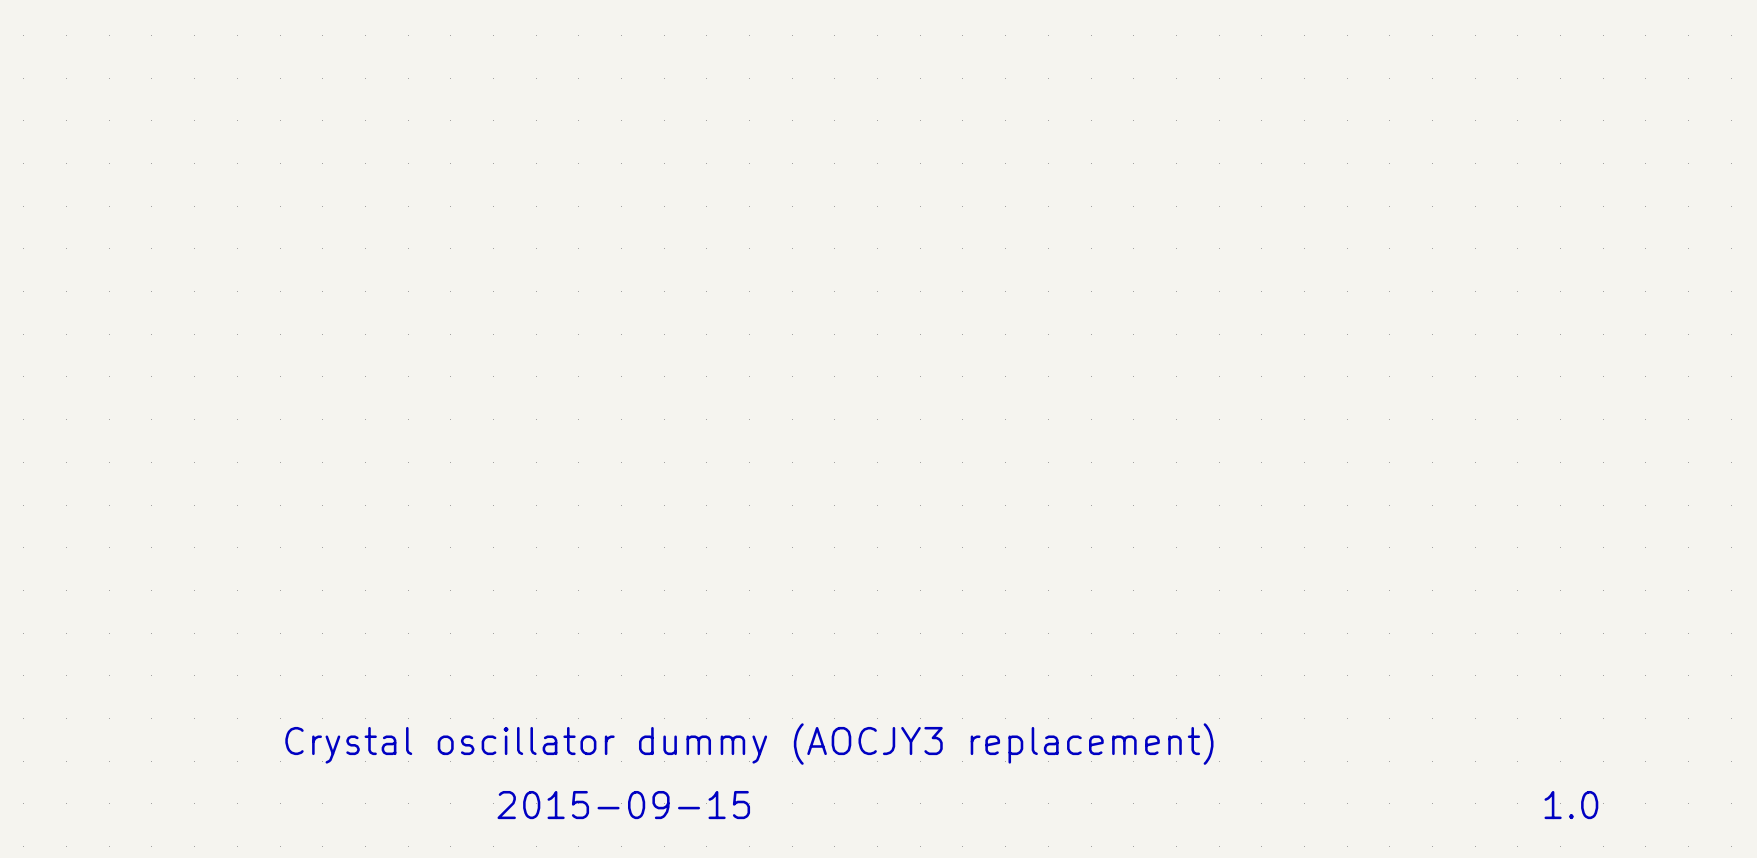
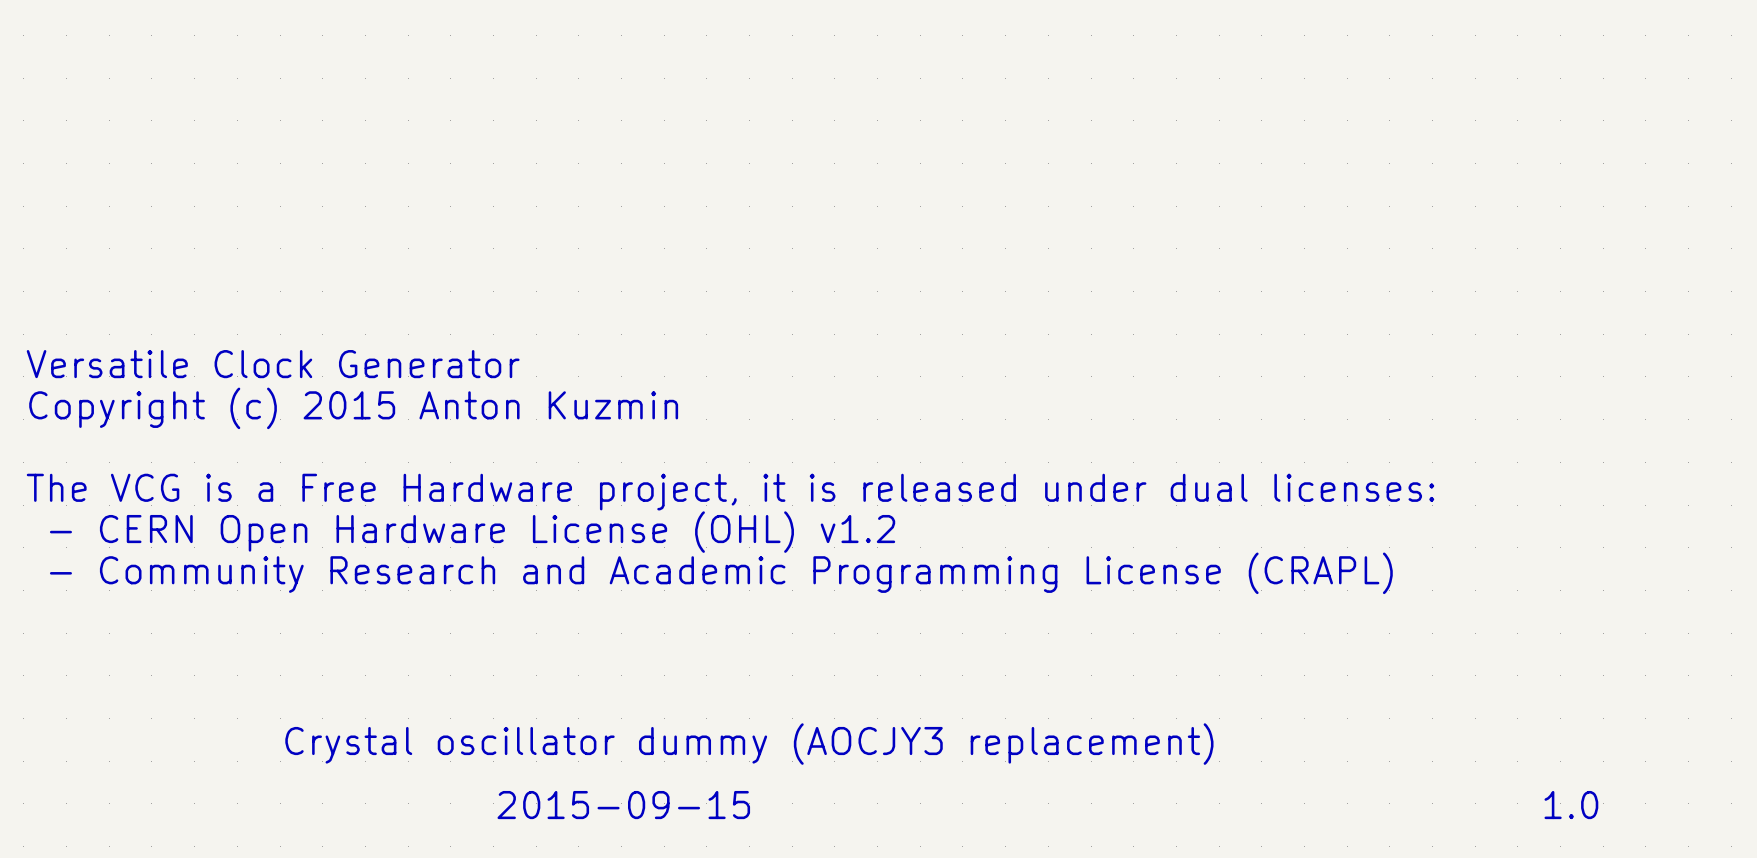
text: none -> Versatile Clock Generator (273, 364)
text: none -> Copyright (c) 2015 Anton Kuzmin (353, 408)
text: none -> The VCG is a Free Hardware project, it is released under dual licenses: (730, 492)
text: none -> - CERN Open Hardware License (OHL) v1.2 (472, 532)
text: none -> - Community Research and Academic Programming License (CRAPL) (721, 573)

